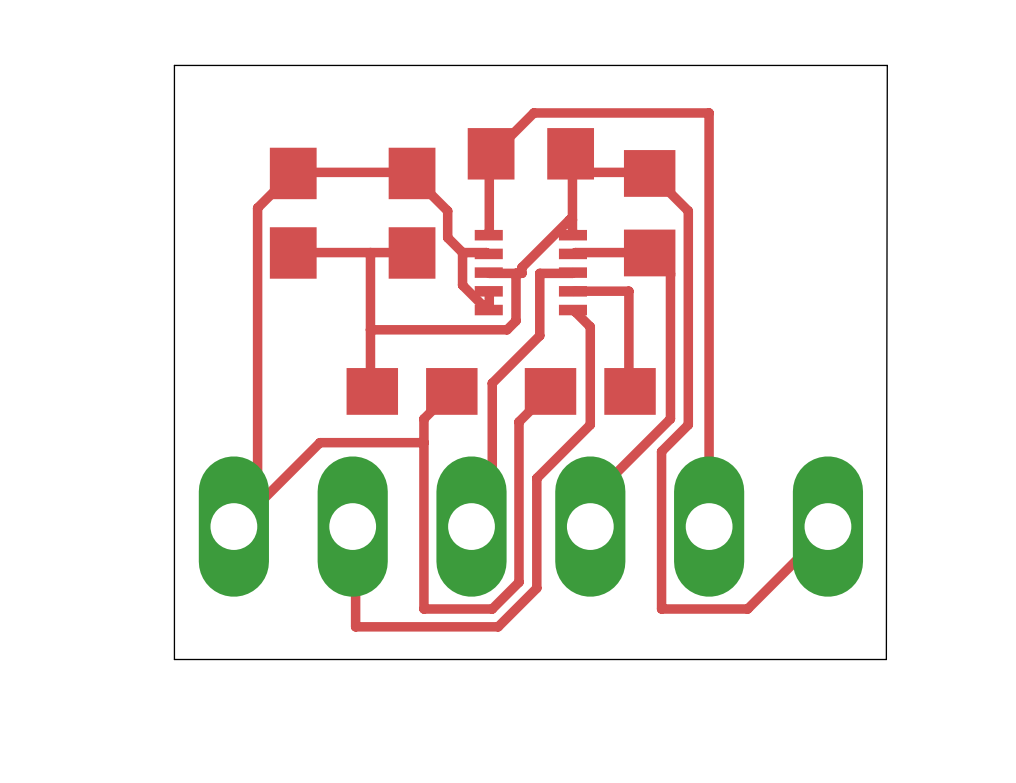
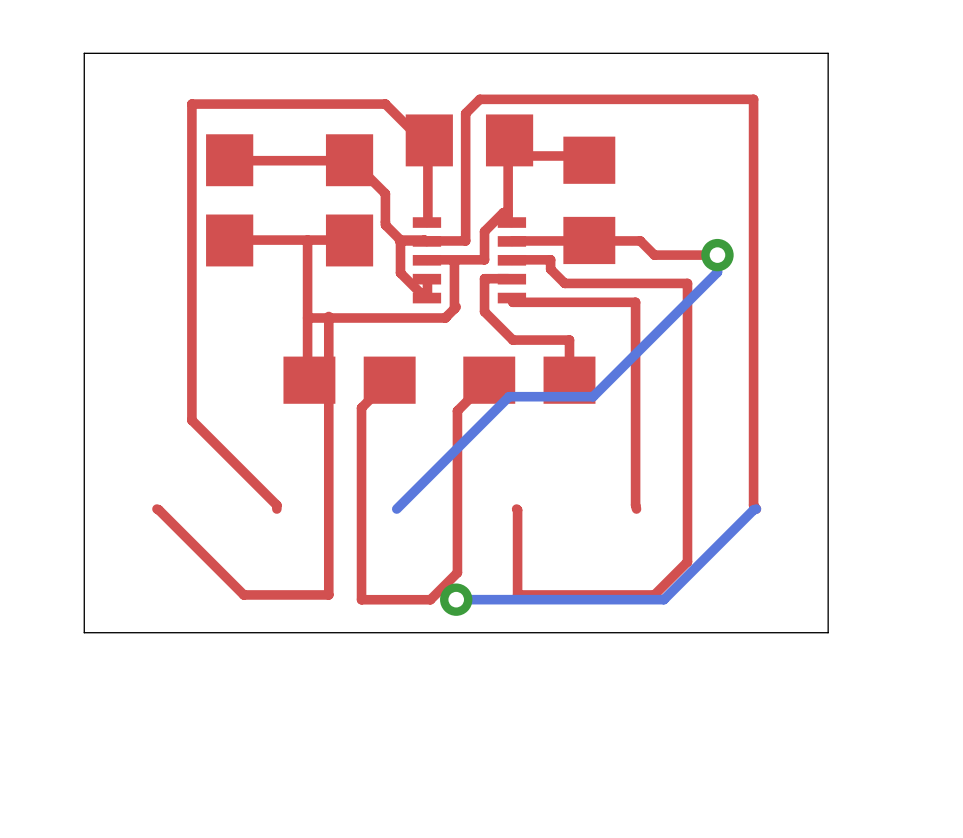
board edge: (887, 65) (886, 659) (174, 659) (174, 65) (887, 65) -> (828, 53) (828, 632) (84, 632) (84, 53) (828, 53)
top track: (709, 112) (709, 525) -> (649, 99) (753, 99) (753, 505) (756, 509)
top track: (541, 113) (533, 112) (495, 151) (489, 154) (489, 231) (486, 234) (488, 235) -> (479, 99) (465, 113) (465, 240) (399, 240)
top track: (447, 210) (409, 172) (293, 172) (257, 208) (257, 499) (233, 526) (236, 525) (319, 442) (423, 442) -> (385, 198) (385, 193) (352, 160) (229, 160)
top track: (572, 219) (569, 219) (521, 267) (521, 273) (489, 273) -> (508, 212) (503, 212) (484, 231) (484, 259) (426, 260)
top track: none -> (426, 222) (429, 140) (423, 141) (385, 104) (191, 104) (191, 420) (276, 505) (276, 509)
top track: (572, 235) (575, 234) (572, 231) (572, 154) (570, 153) (575, 172) (649, 172) (688, 210) (688, 424) (661, 451) (661, 609) (747, 609) (827, 528) (827, 526) -> (511, 222) (508, 222) (509, 140) (512, 155) (588, 155) (589, 160)
top track: (649, 252) (572, 253) -> (717, 255) (654, 255) (640, 240) (511, 241)
top track: (649, 252) (670, 273) (670, 418) (593, 496) (593, 525) (590, 526) -> none
bottom track: none -> (717, 255) (717, 272) (593, 396) (509, 396) (396, 509)
via: none -> (717, 255)
top track: (572, 273) (539, 273) (539, 335) (492, 383) (492, 508) (471, 526) -> (511, 260) (550, 259) (550, 269) (564, 283) (687, 283) (687, 561) (654, 594) (517, 594) (516, 509)
top track: (572, 291) (628, 291) (630, 391) -> (511, 279) (484, 278) (484, 311) (512, 340) (569, 340) (569, 380)
top track: (572, 310) (590, 326) (590, 424) (536, 478) (536, 588) (498, 626) (355, 626) (355, 528) (352, 526) -> (511, 298) (512, 302) (635, 302) (636, 509)
top track: none -> (328, 316) (328, 594) (243, 594) (156, 509)
bottom track: none -> (756, 509) (663, 599) (456, 599)
part: (530, 526) -> none
via: none -> (456, 599)

